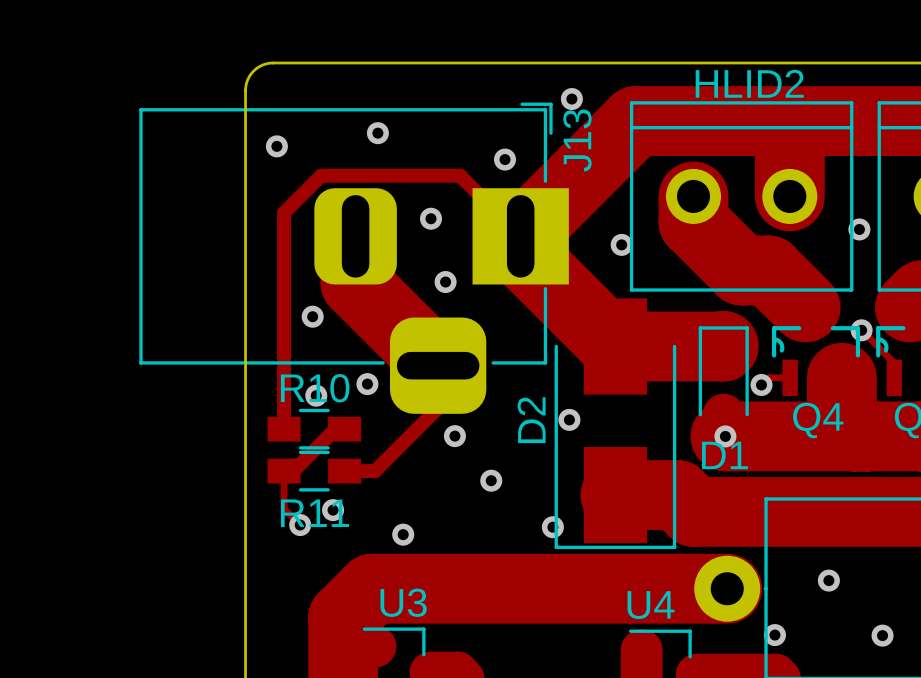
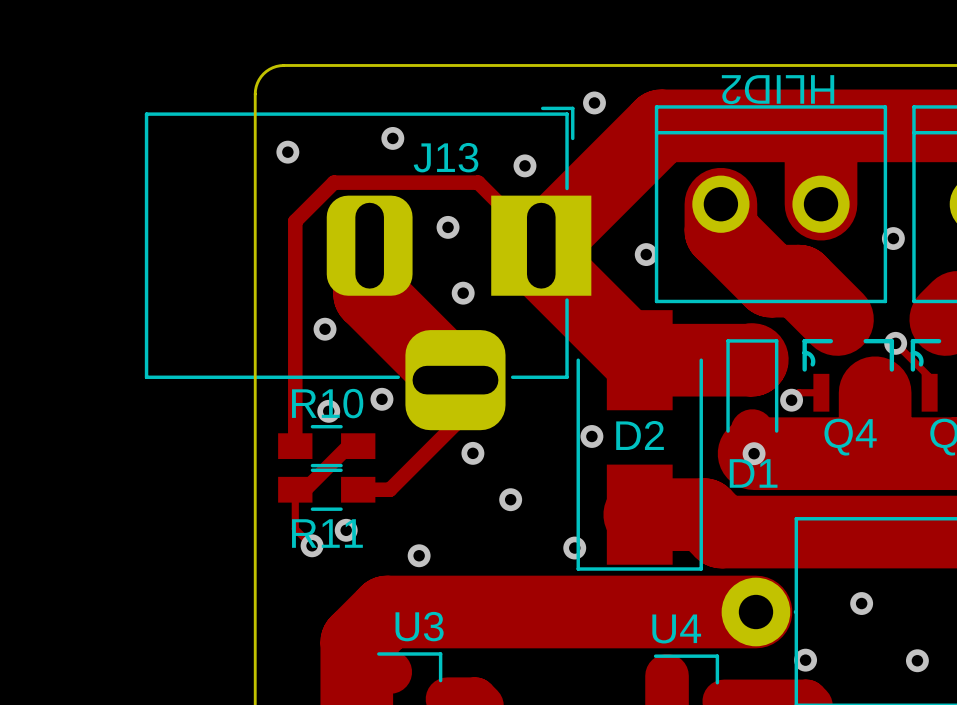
HLID2 name rotation: 0° (749, 83) -> 180° (778, 89)
J13 name rotation: 0° (577, 140) -> 90° clockwise (446, 157)
J13 name position: J13 (577, 140) -> J13 (446, 157)
D2 name rotation: 0° (531, 420) -> 90° clockwise (640, 435)
D2 name position: D2 (531, 420) -> D2 (640, 435)

